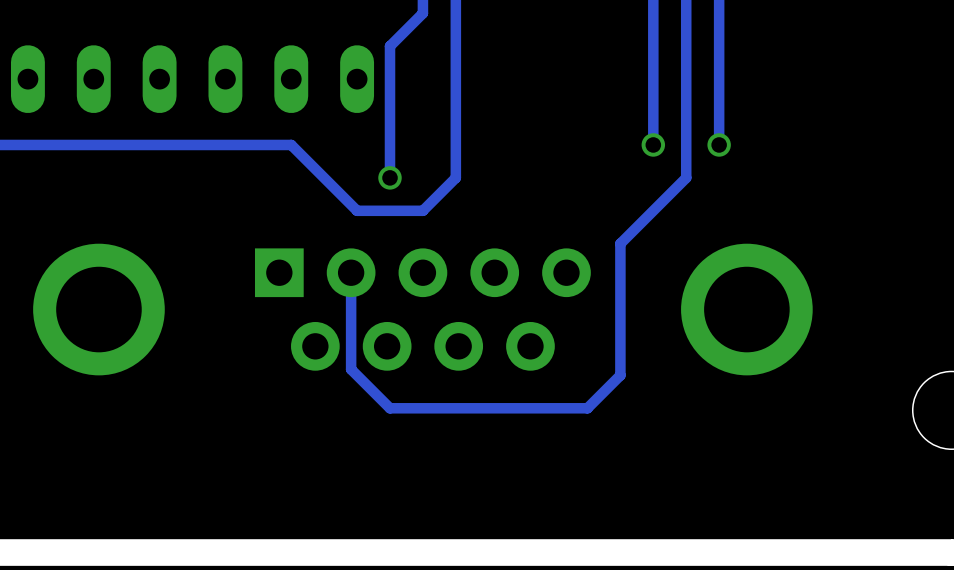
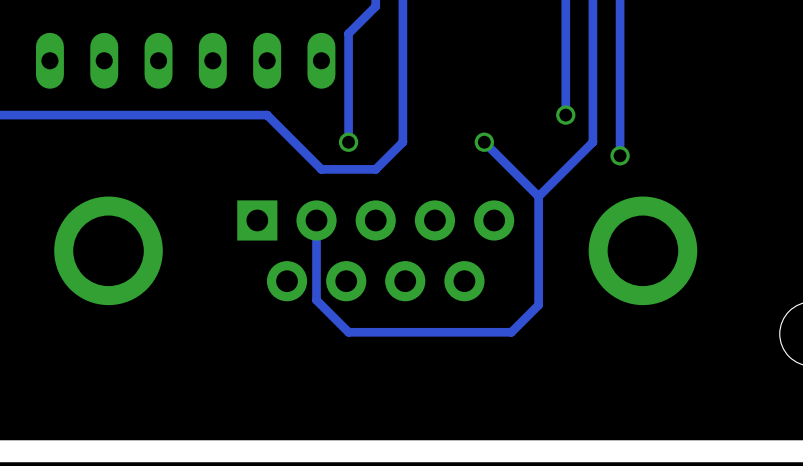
track: none -> (620, 115) (620, 155)
via position: (719, 144) -> (620, 155)
track: none -> (484, 142) (538, 196)
via: none -> (484, 142)

